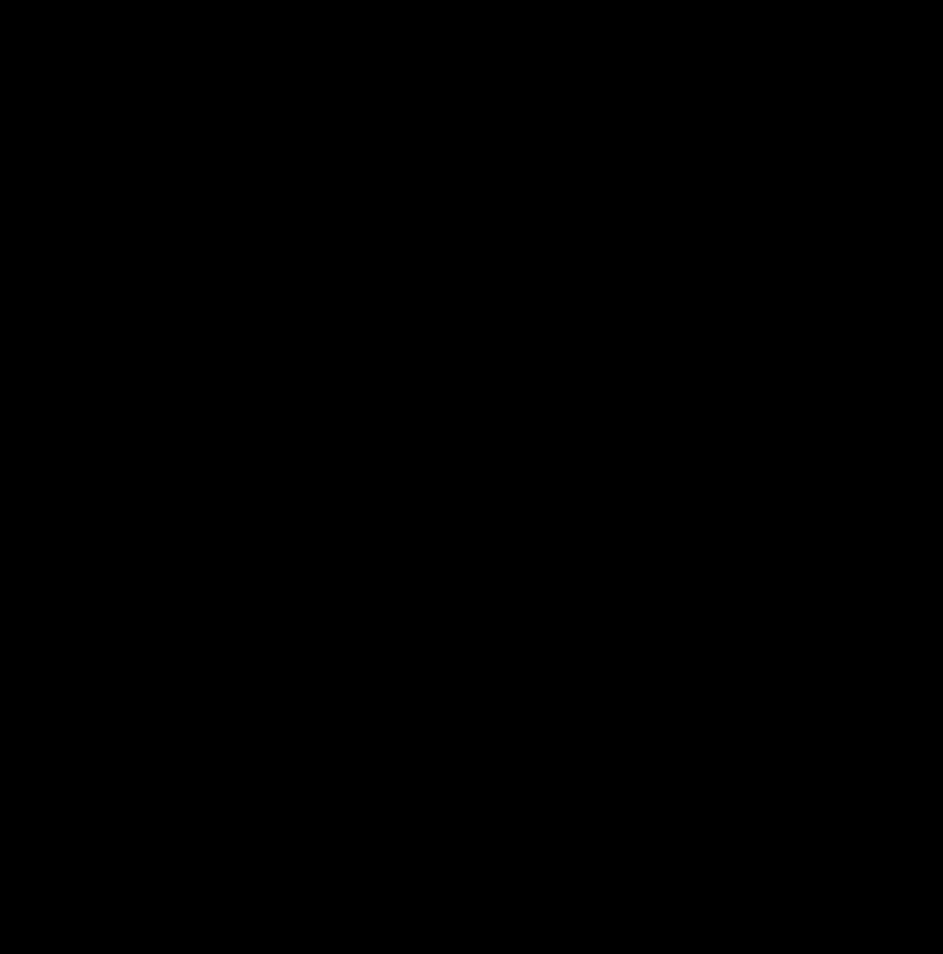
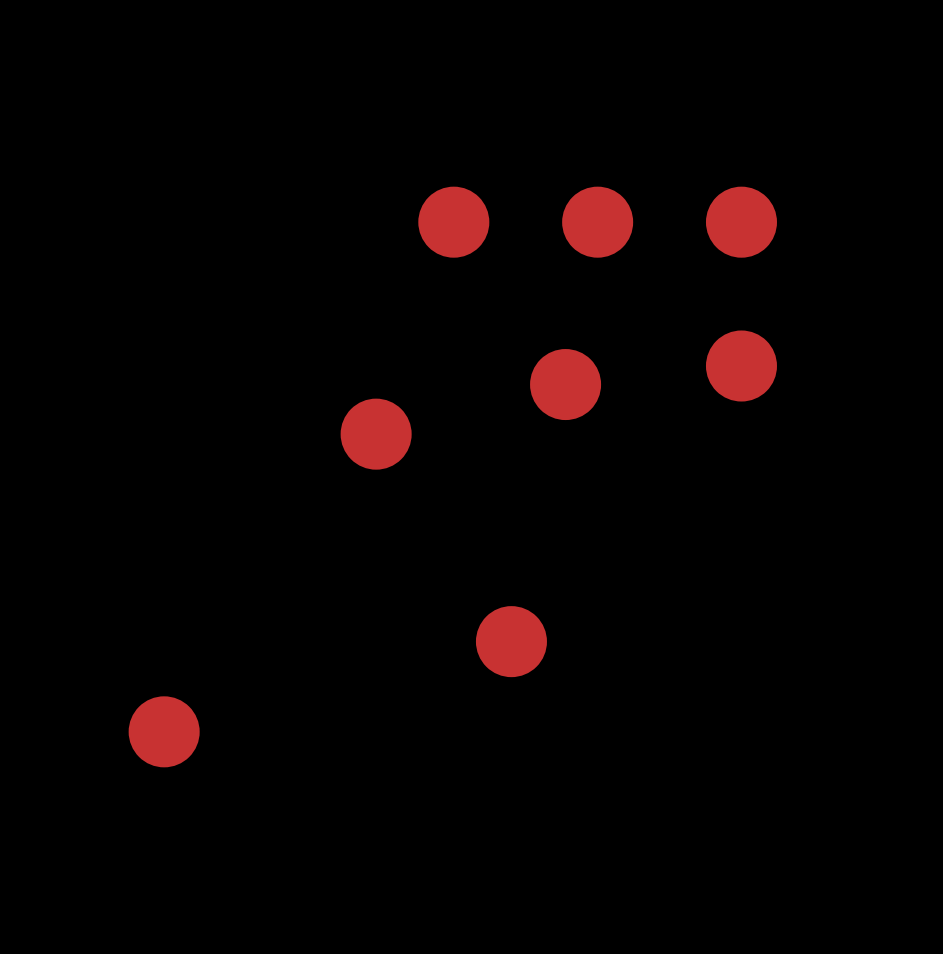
part: none -> (453, 222)
part: none -> (597, 222)
part: none -> (741, 222)
part: none -> (741, 366)
part: none -> (565, 384)
part: none -> (376, 434)
part: none -> (511, 641)
part: none -> (164, 731)

